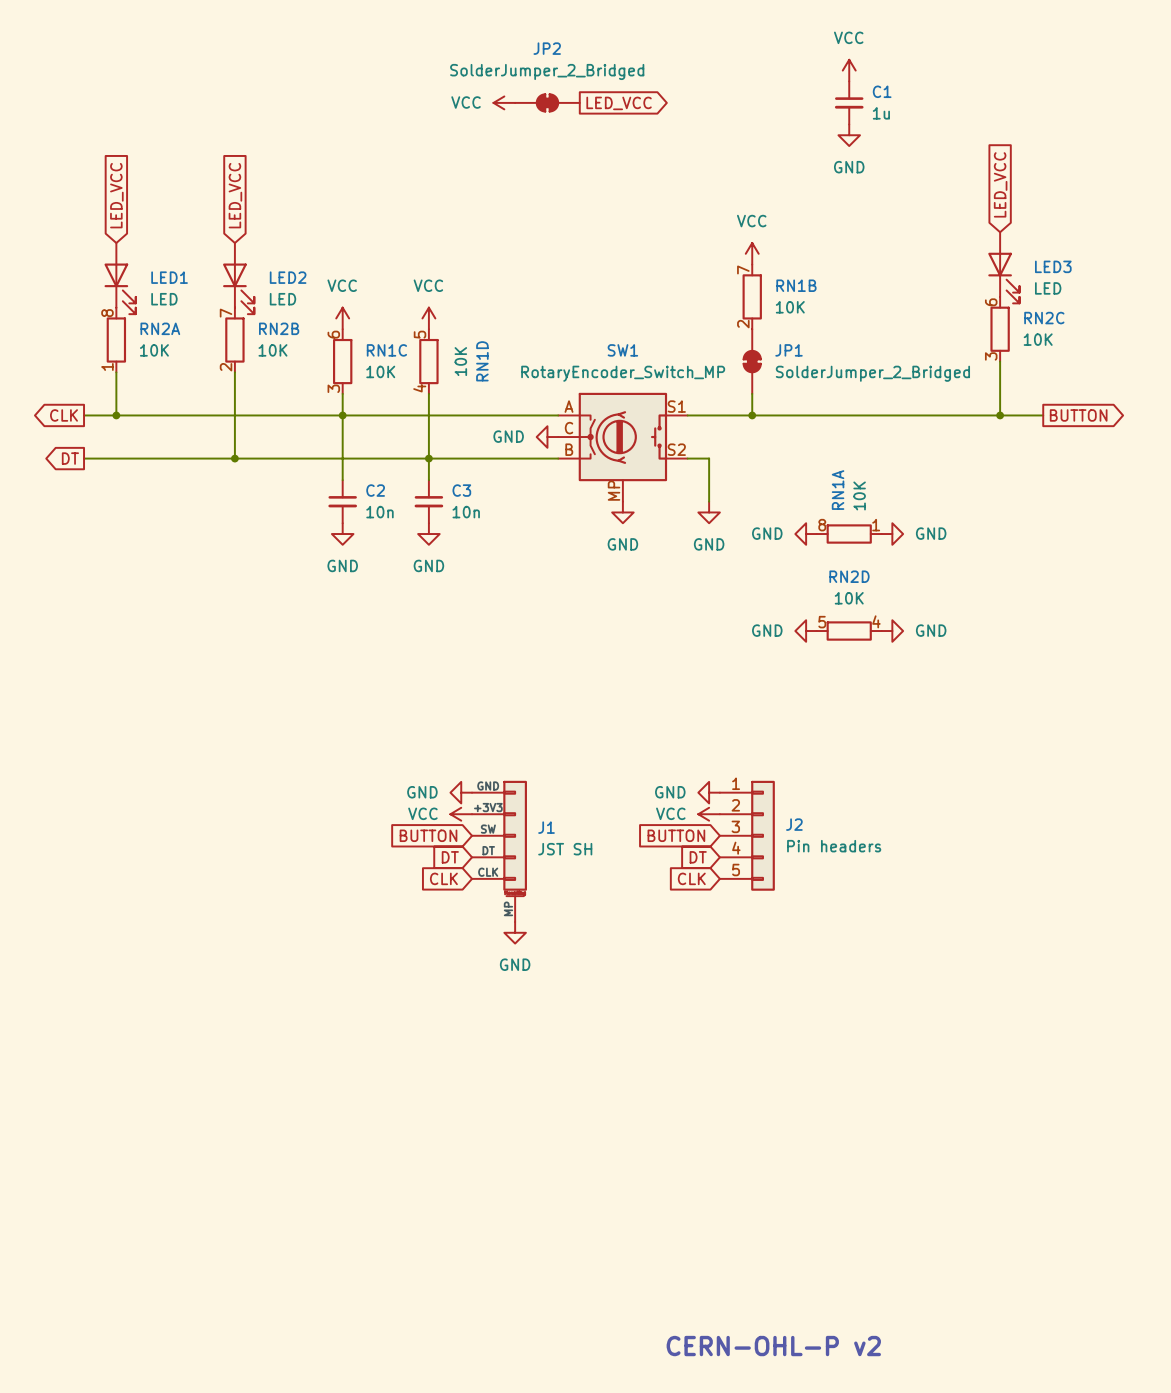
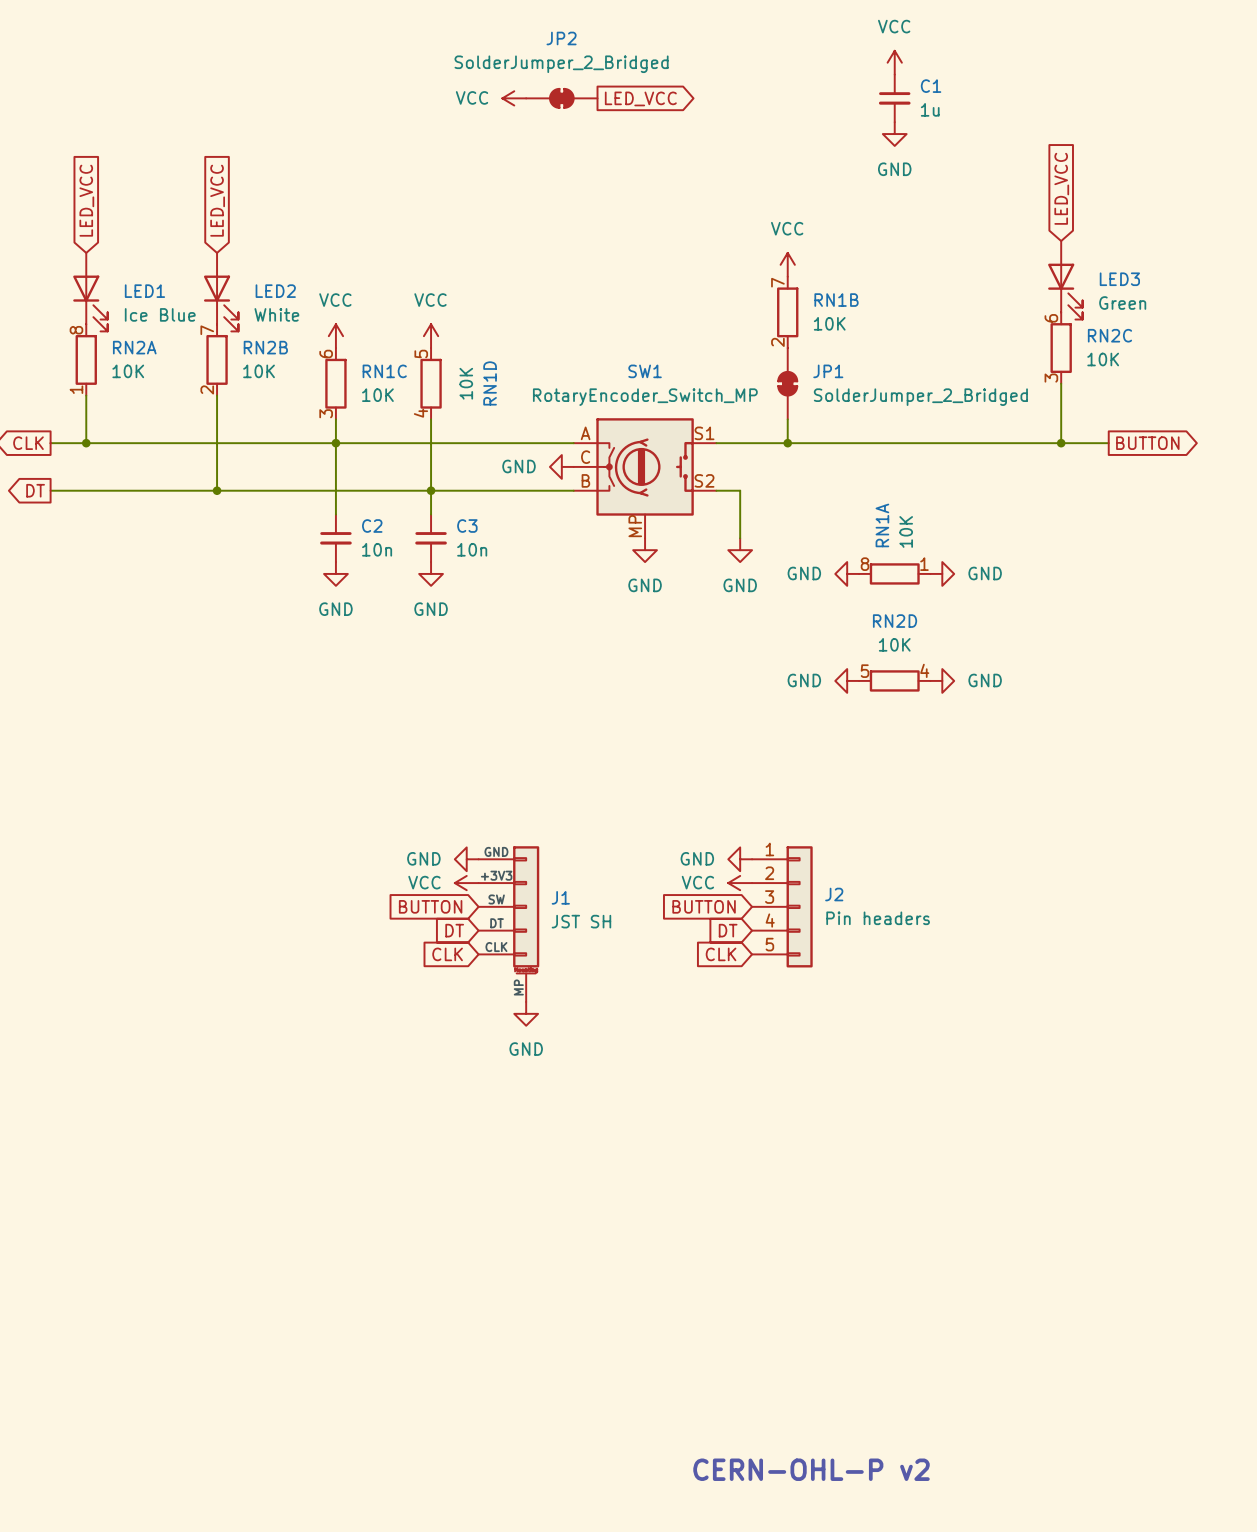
LED3 value: LED (1048, 288) -> Green (1122, 303)
LED1 value: LED (164, 299) -> Ice Blue (160, 314)
LED2 value: LED (282, 299) -> White (276, 314)

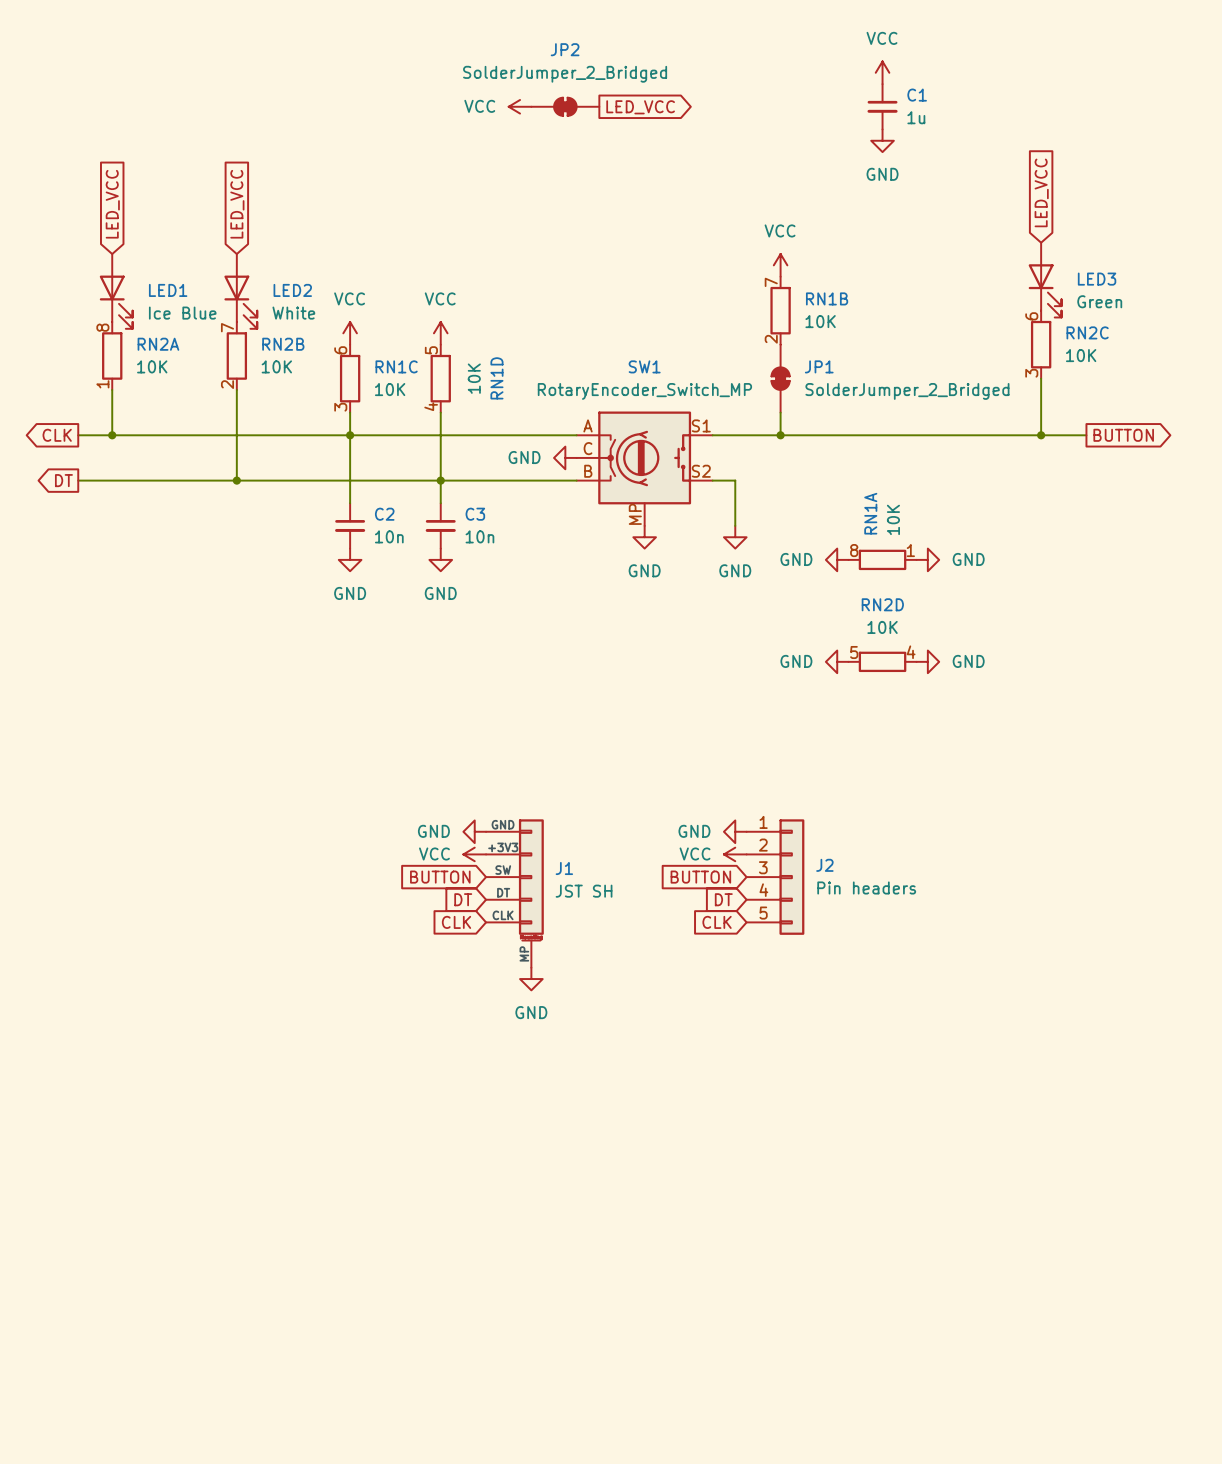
text: CERN-OHL-P v2 (811, 1469) -> none

